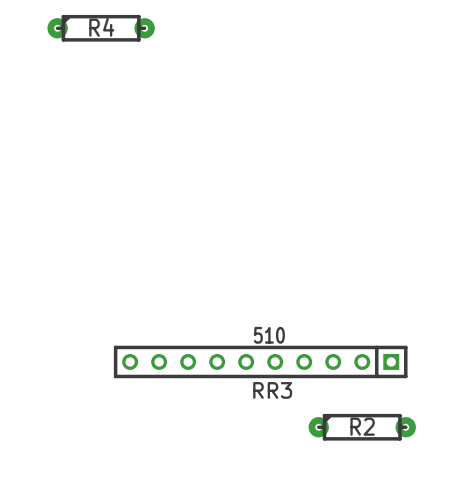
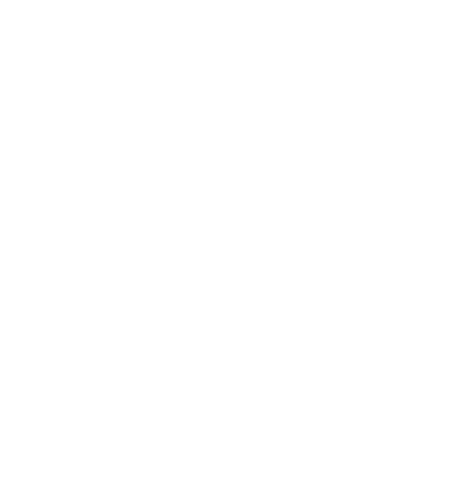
R4: (101, 28) -> none
RR3: 510 (260, 361) -> none
R2: (362, 427) -> none

